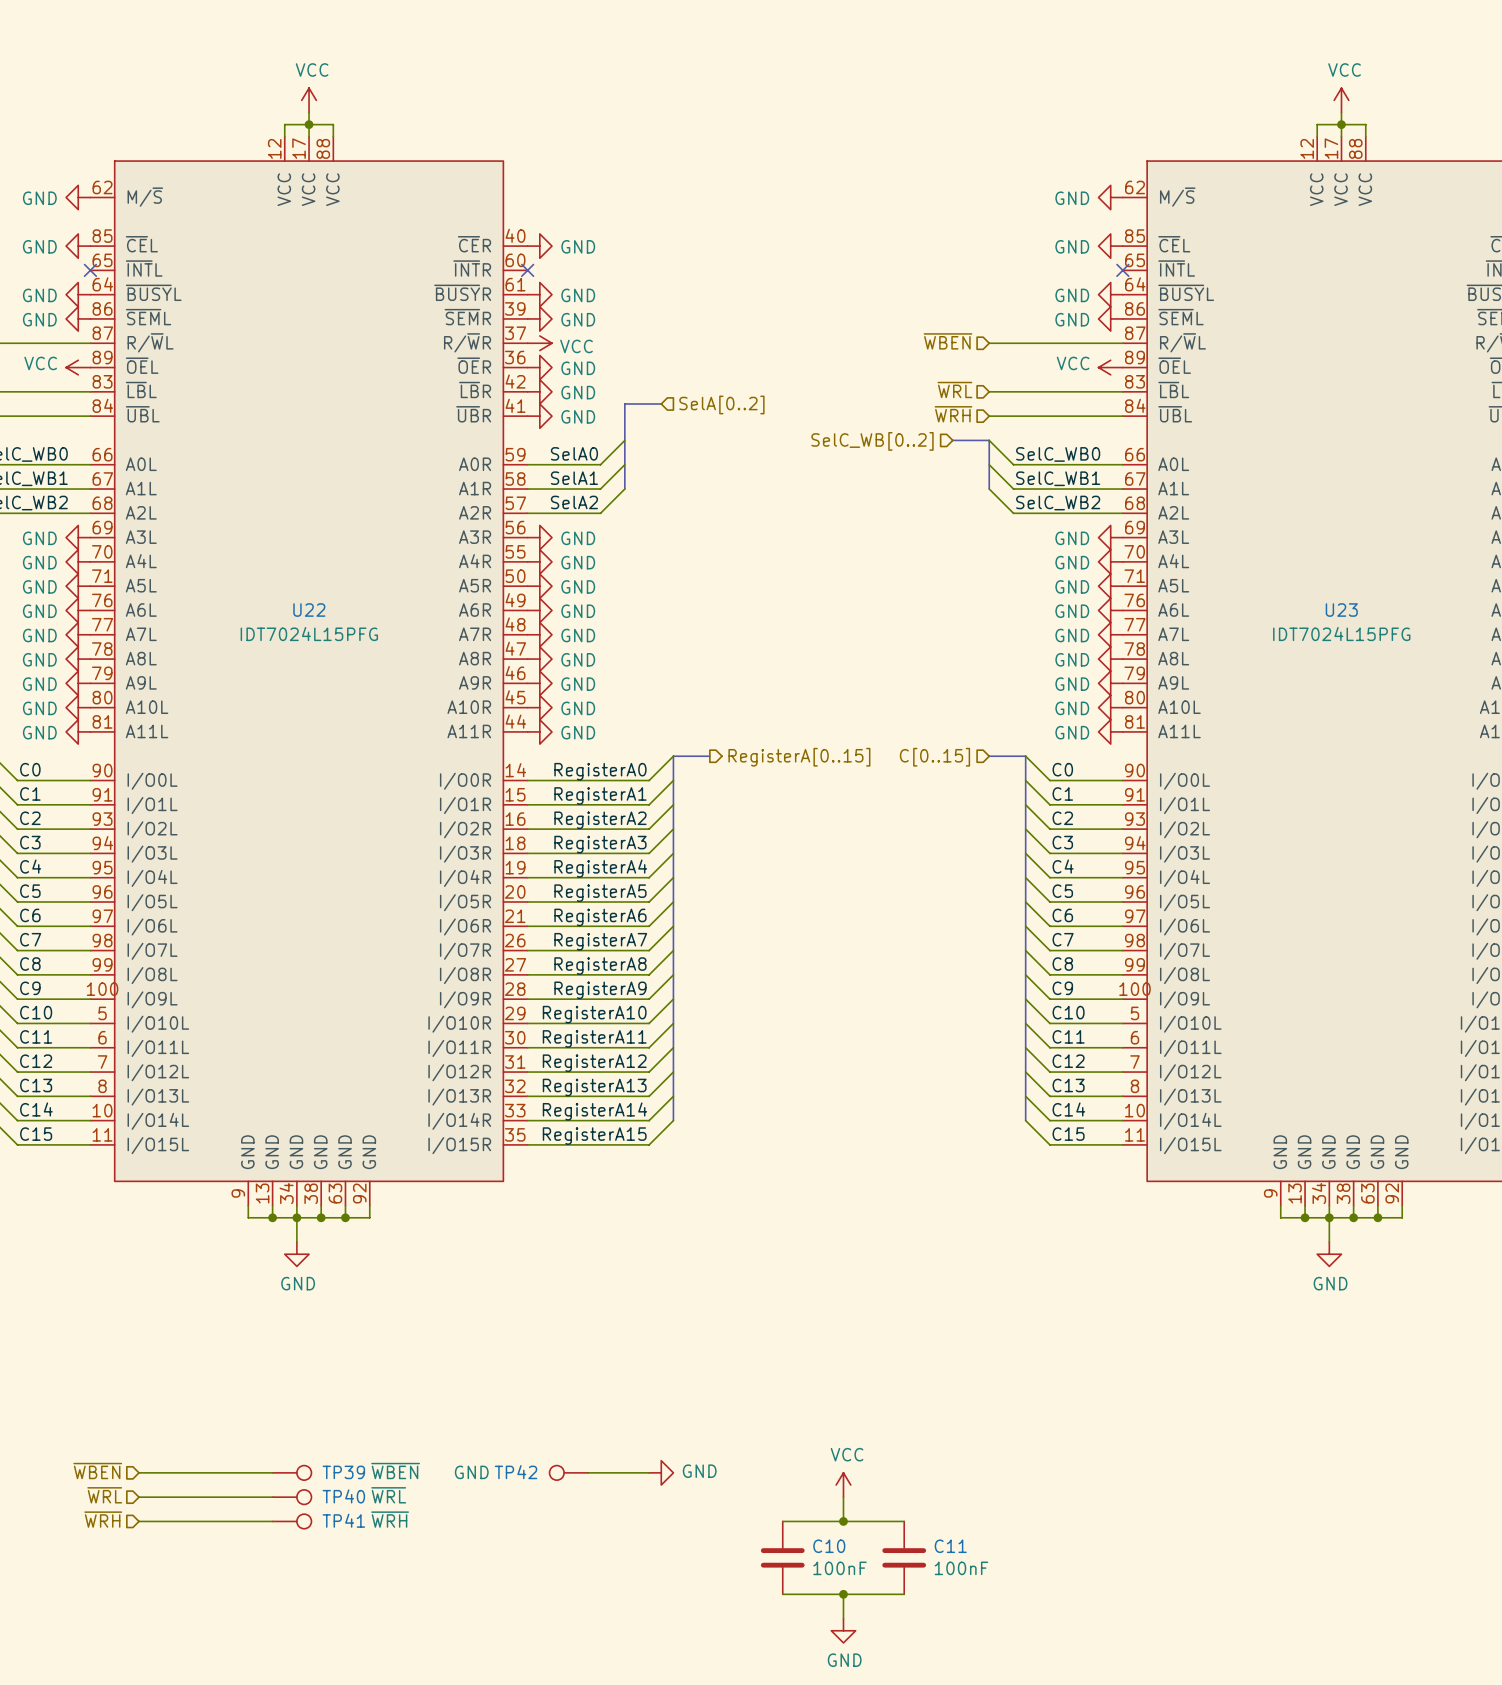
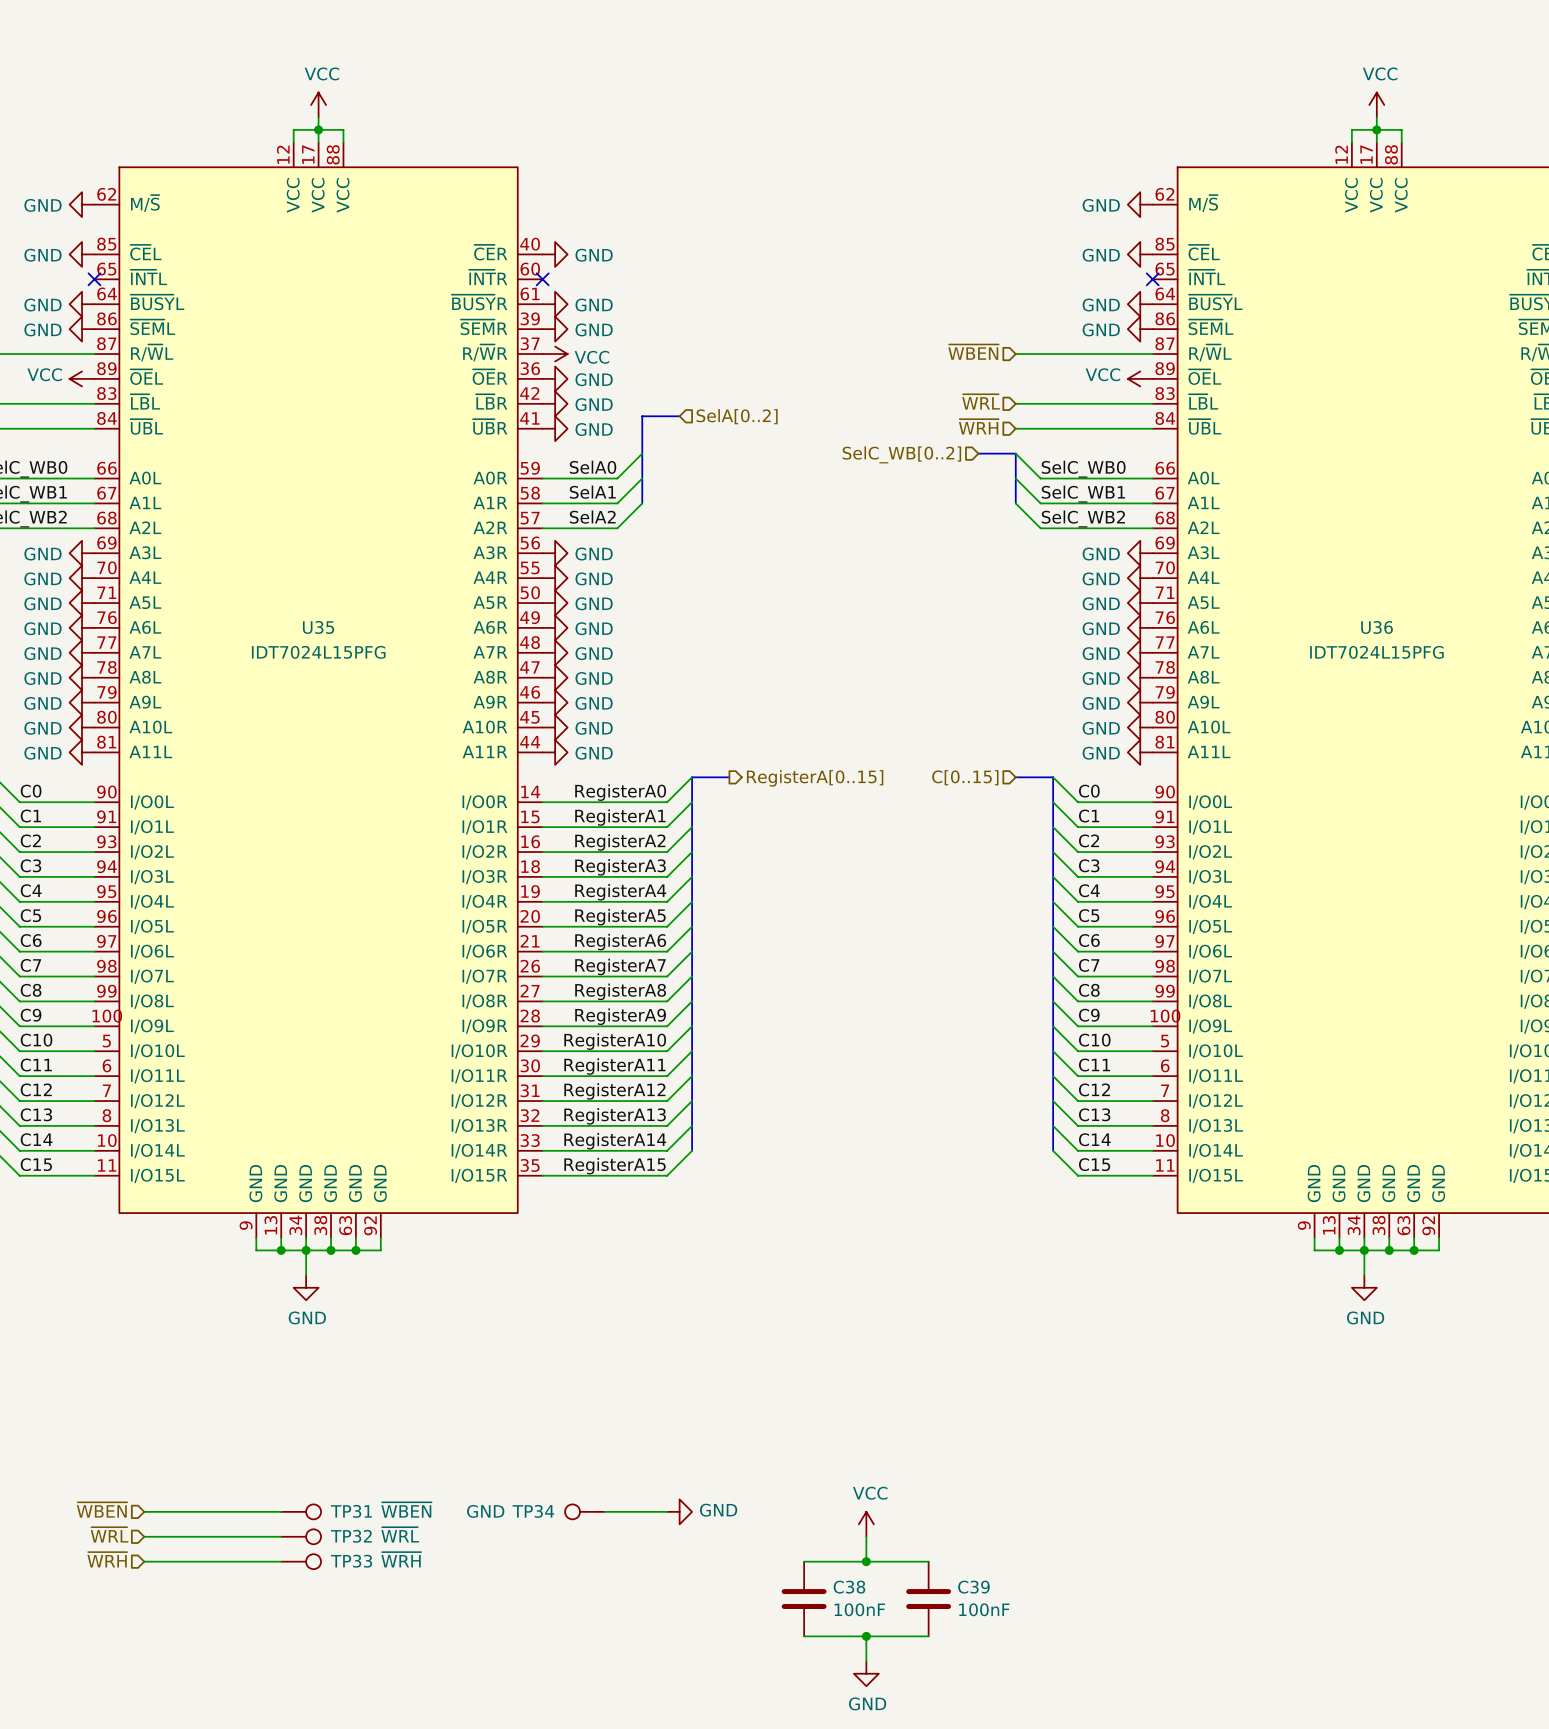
U22 name: U22 (309, 610) -> U35 (318, 627)
U23 name: U23 (1341, 610) -> U36 (1377, 627)
TP39 name: TP39 (343, 1472) -> TP31 (351, 1511)
TP42 name: TP42 (516, 1472) -> TP34 (533, 1511)
TP40 name: TP40 (343, 1496) -> TP32 (351, 1536)
TP41 name: TP41 (343, 1520) -> TP33 (351, 1561)
C10 name: C10 (829, 1546) -> C38 (849, 1587)
C11 name: C11 (950, 1546) -> C39 (973, 1587)

